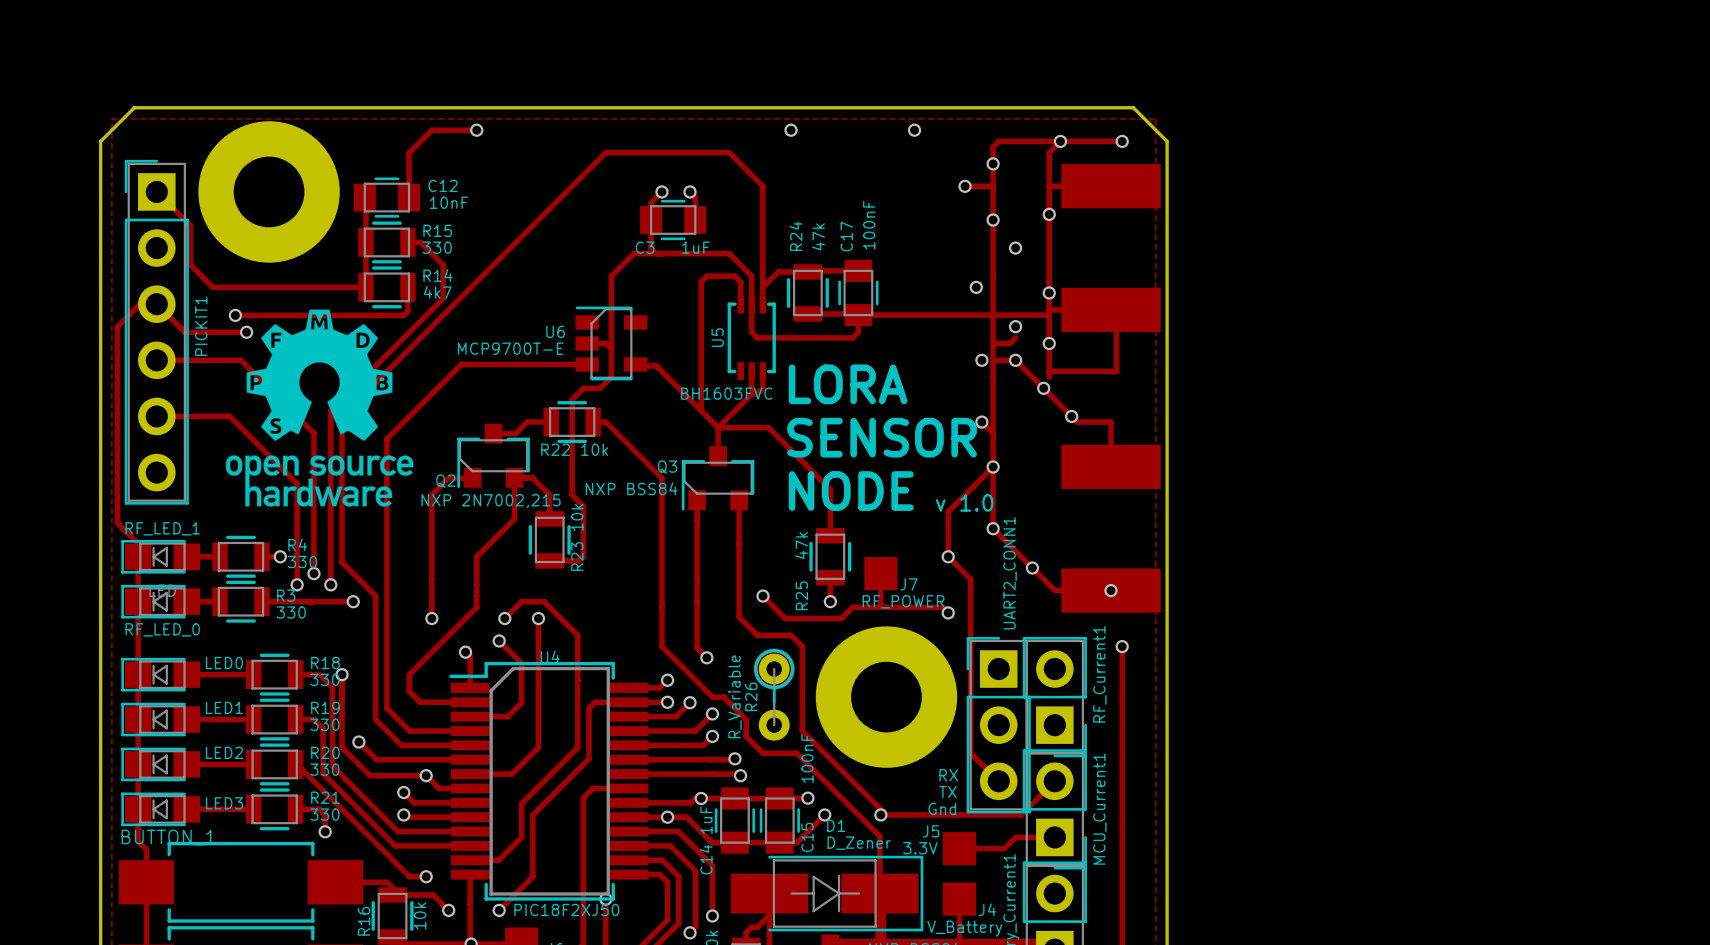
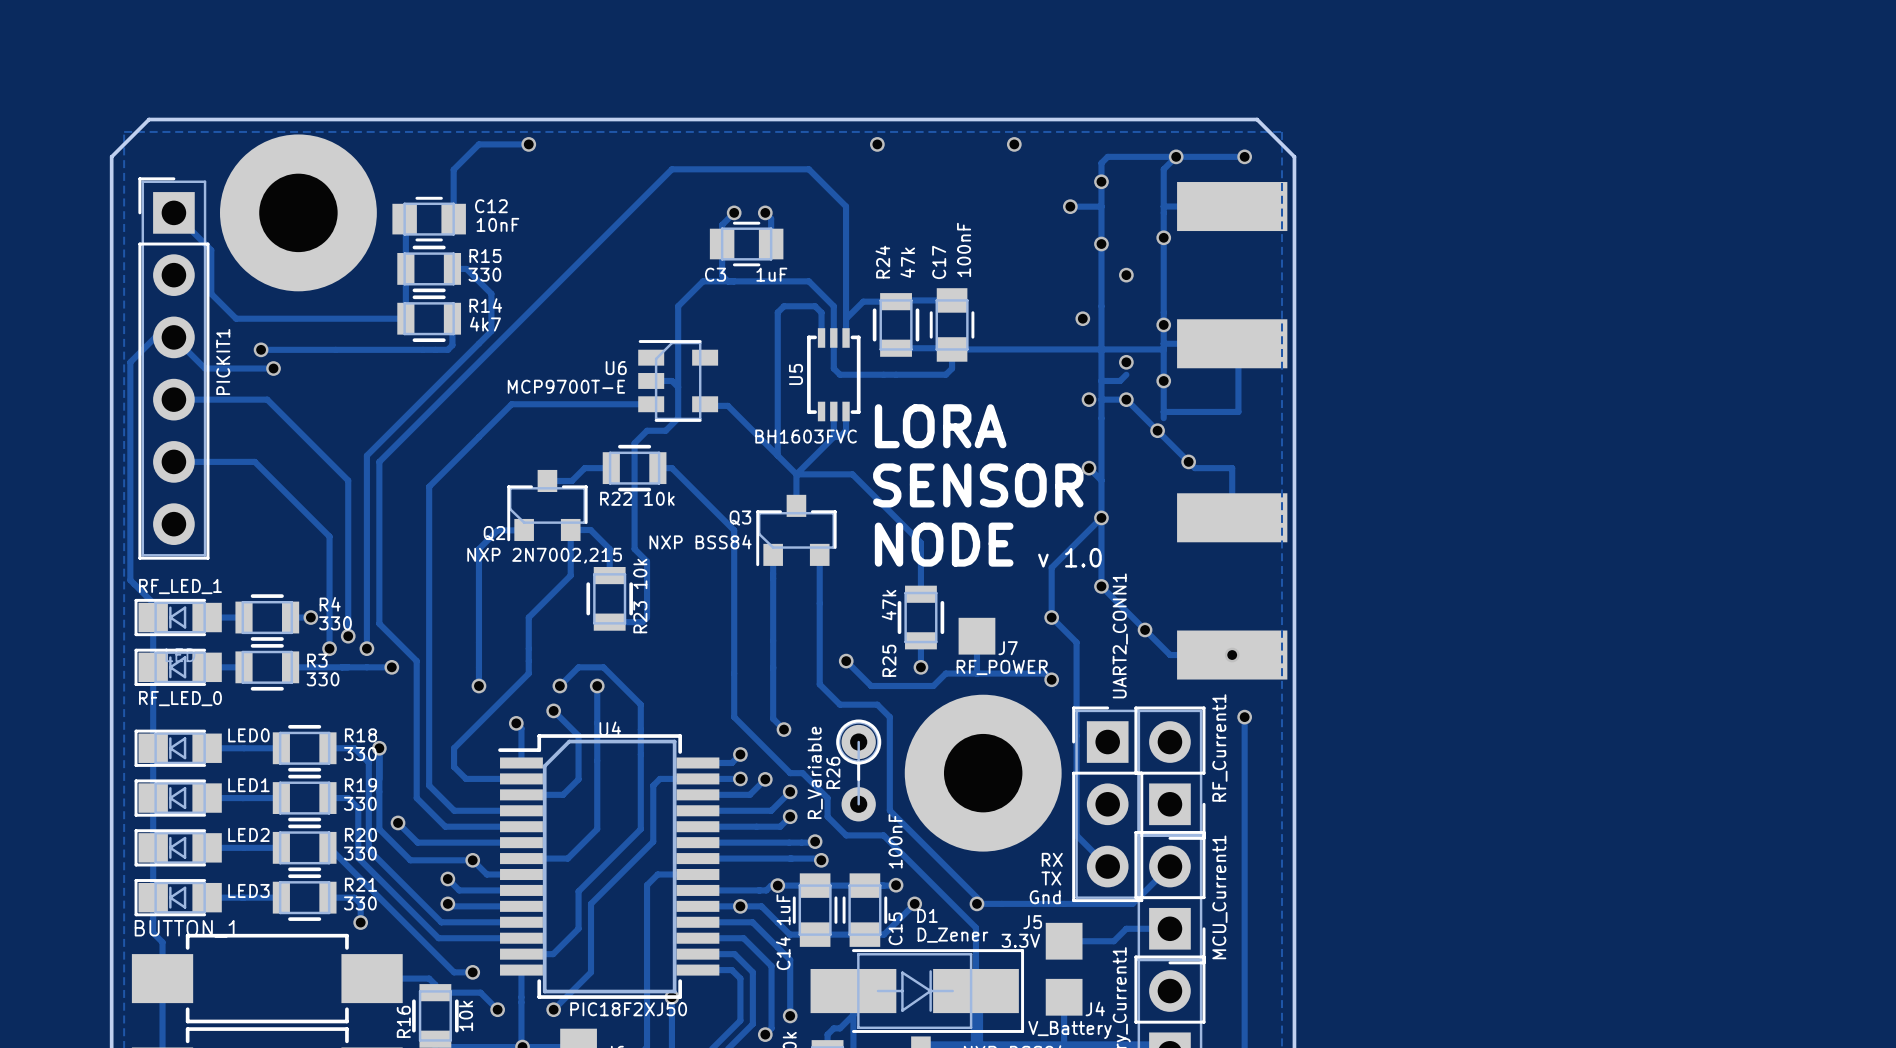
drawing: [225, 309, 414, 507] -> none

